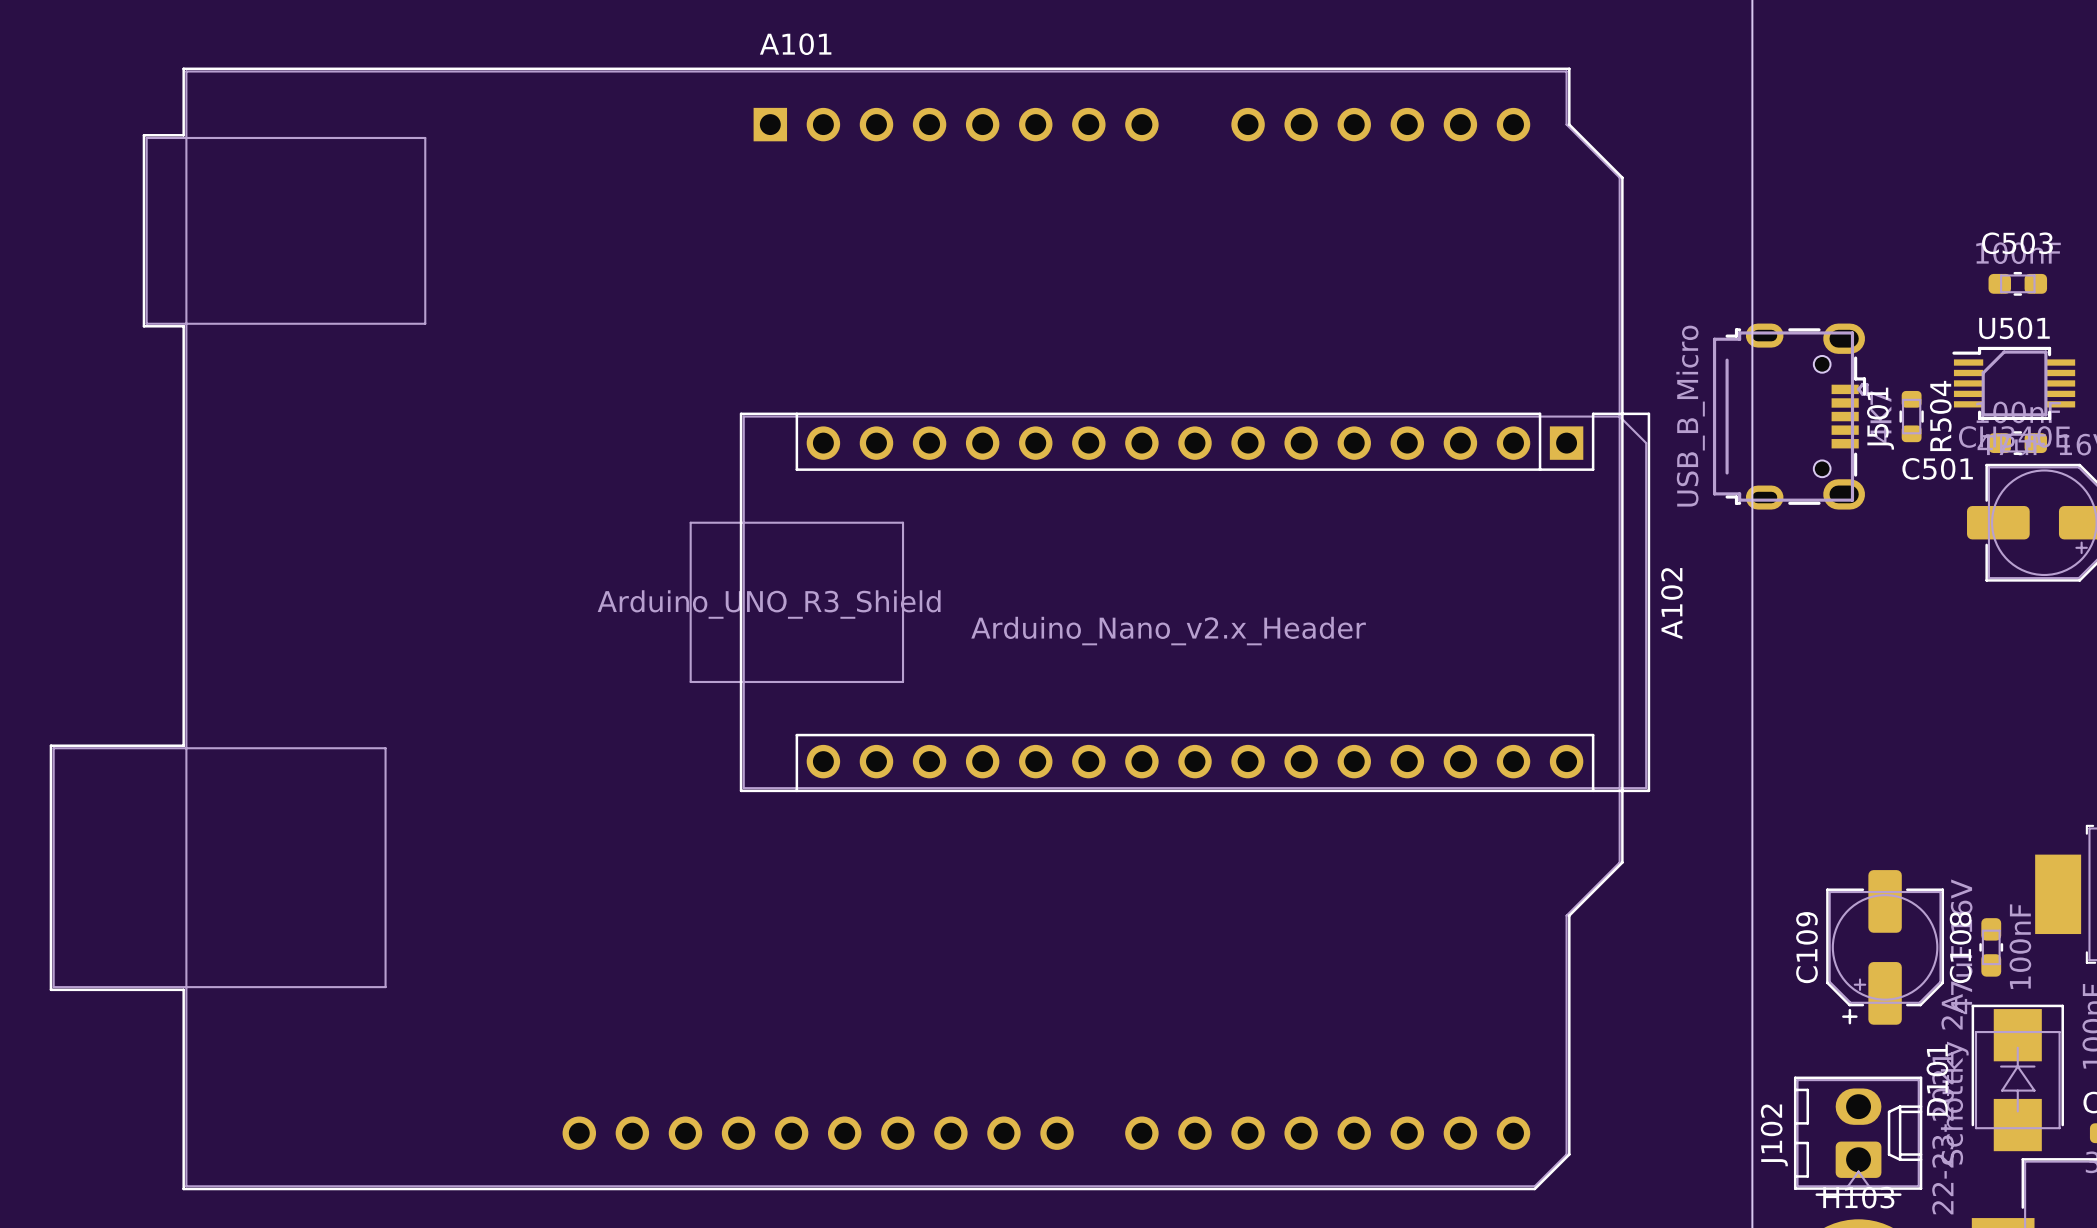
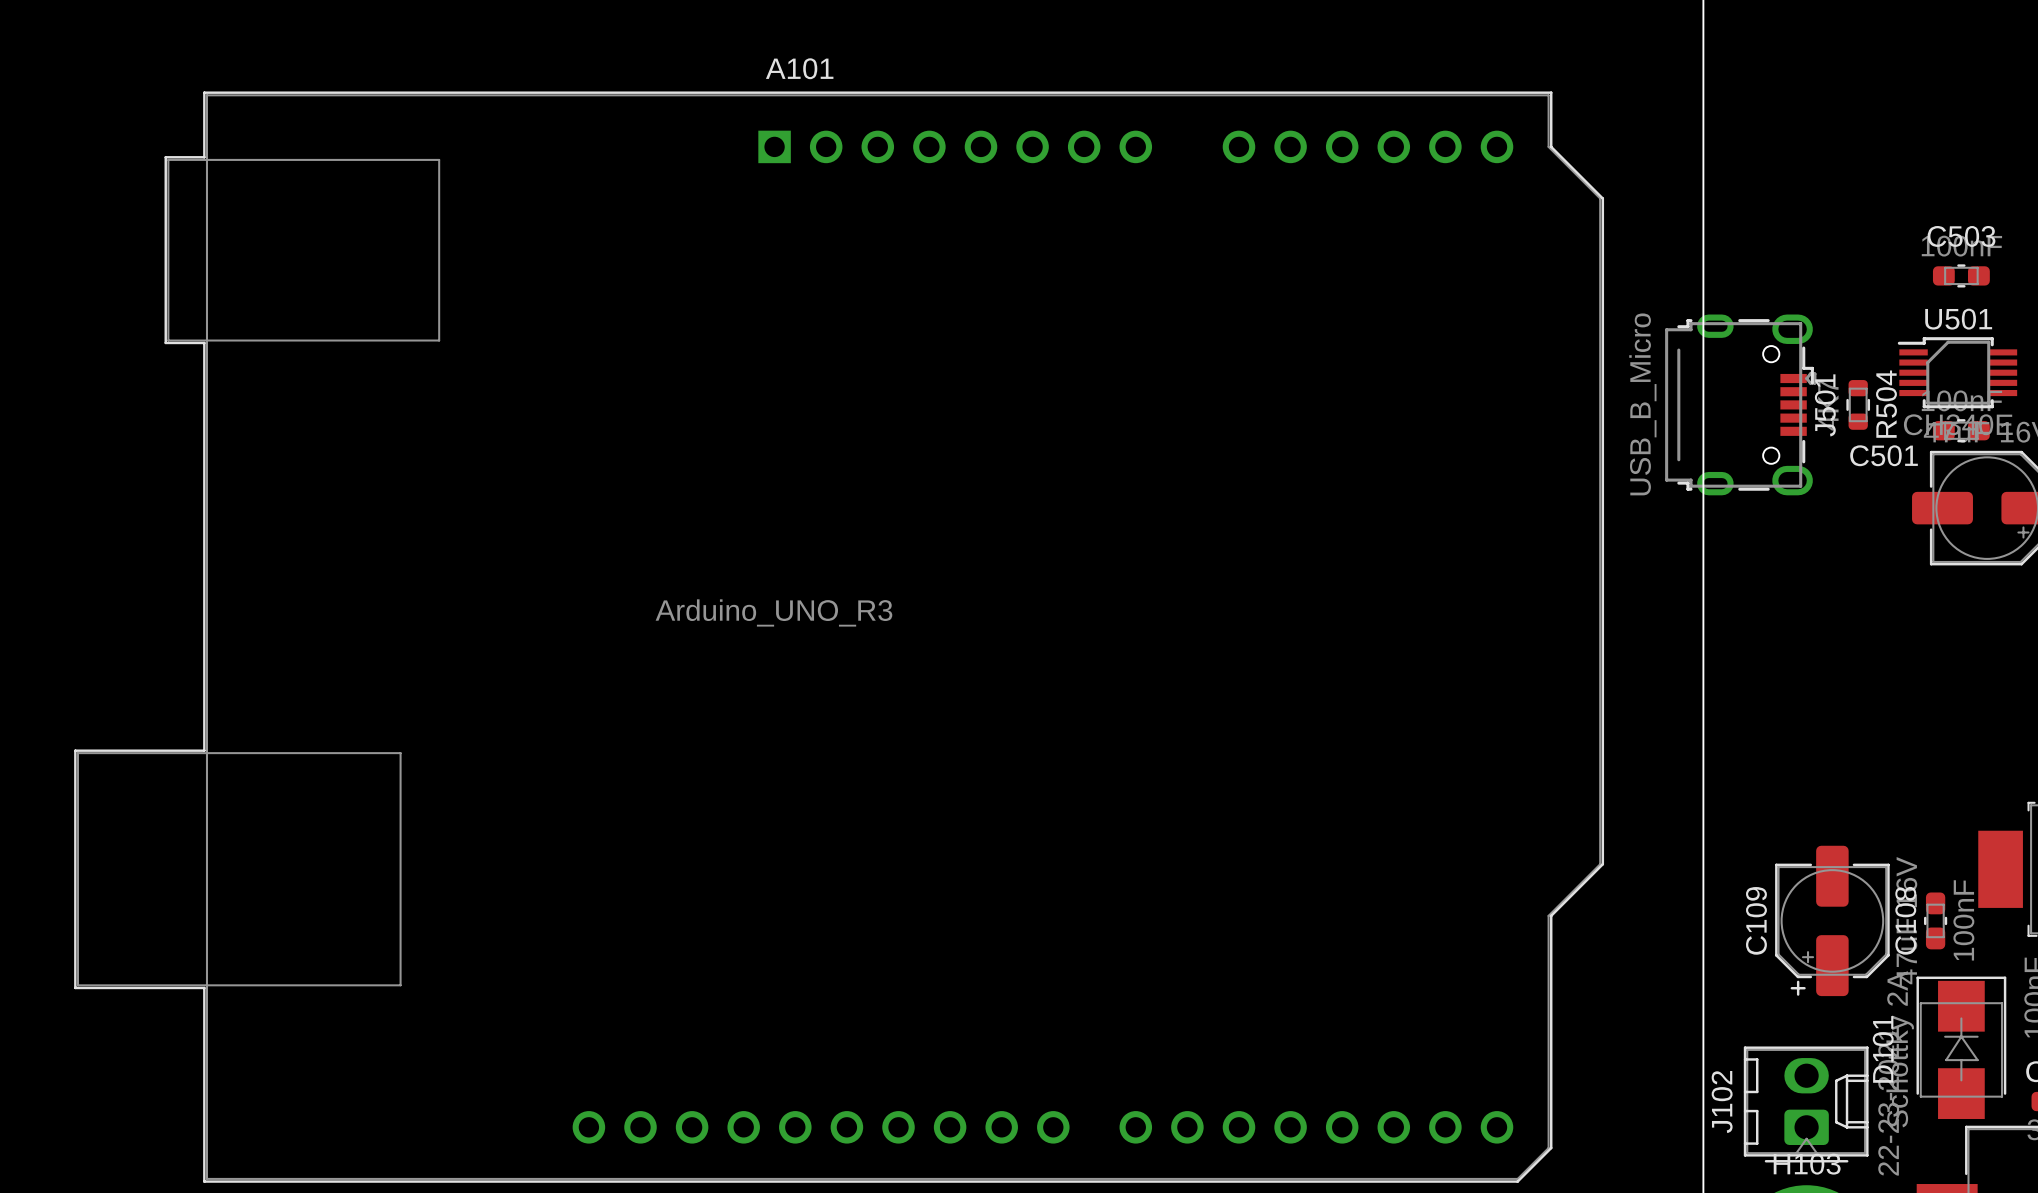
A102: Arduino_Nano_v2.x_Header (1169, 602) -> none
A101 value: Arduino_UNO_R3_Shield (769, 604) -> Arduino_UNO_R3 (773, 612)
A101 position: (836, 628) -> (839, 637)

